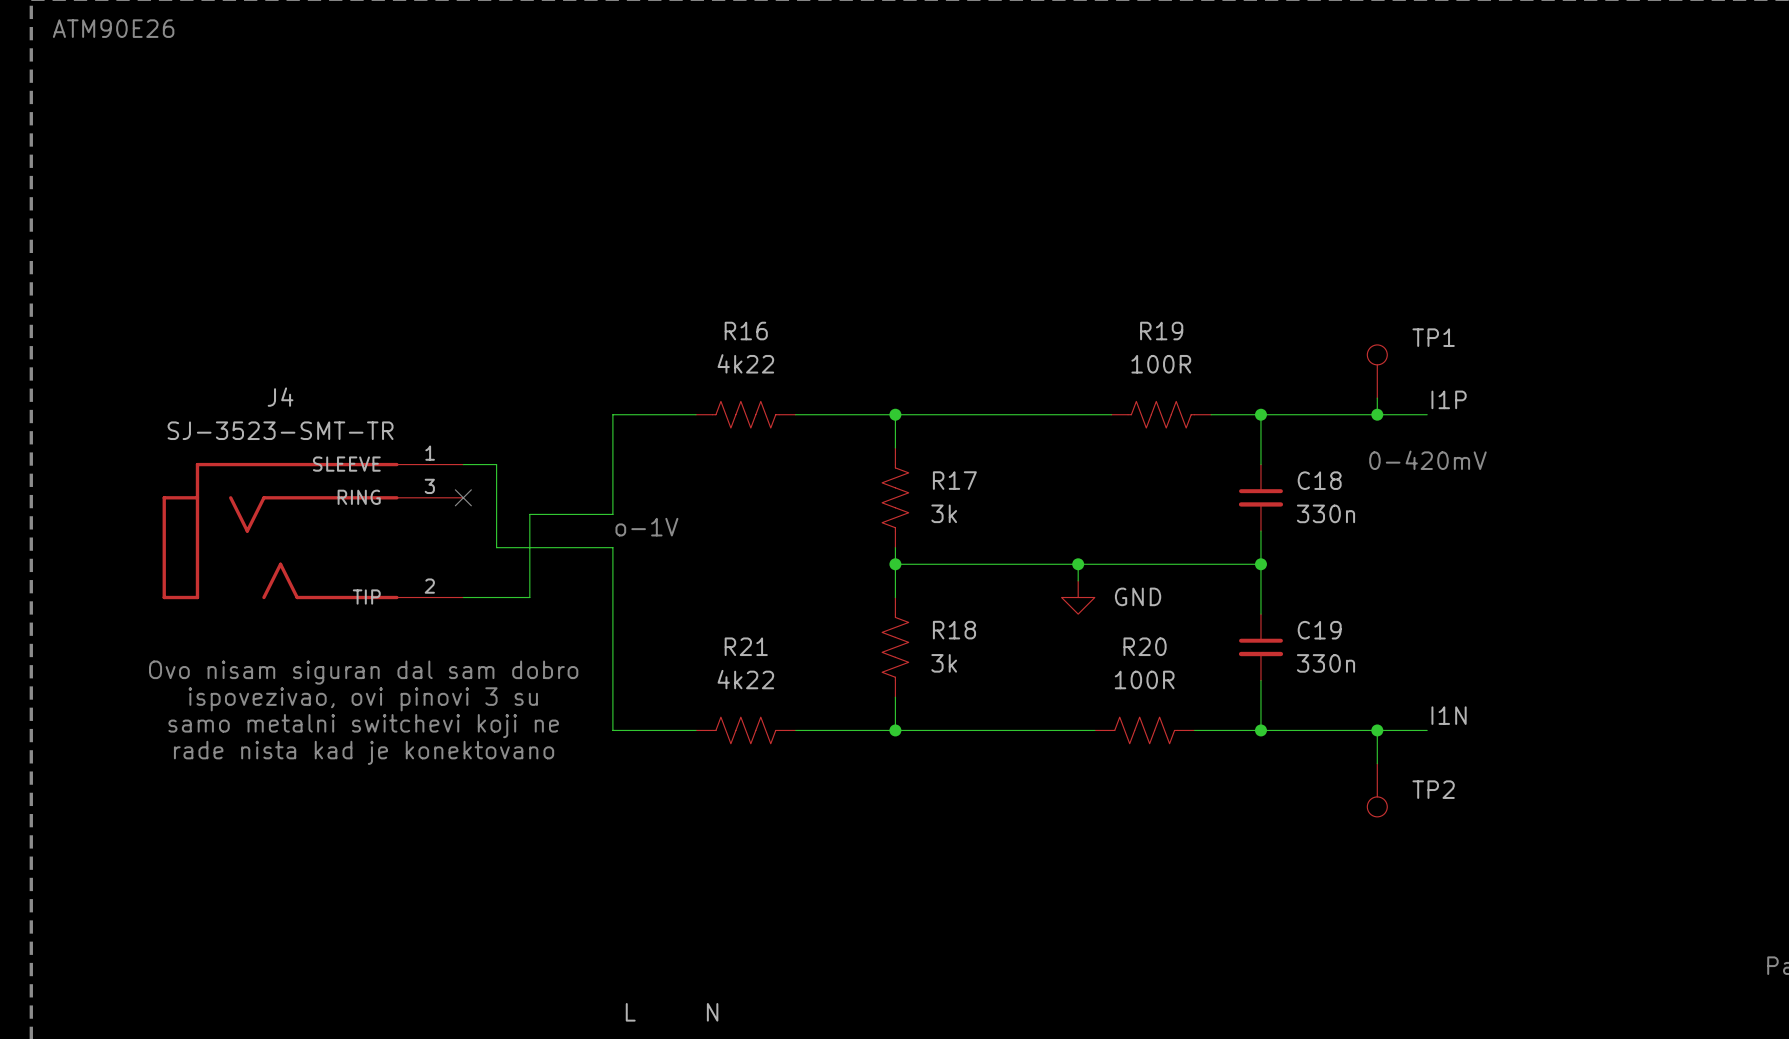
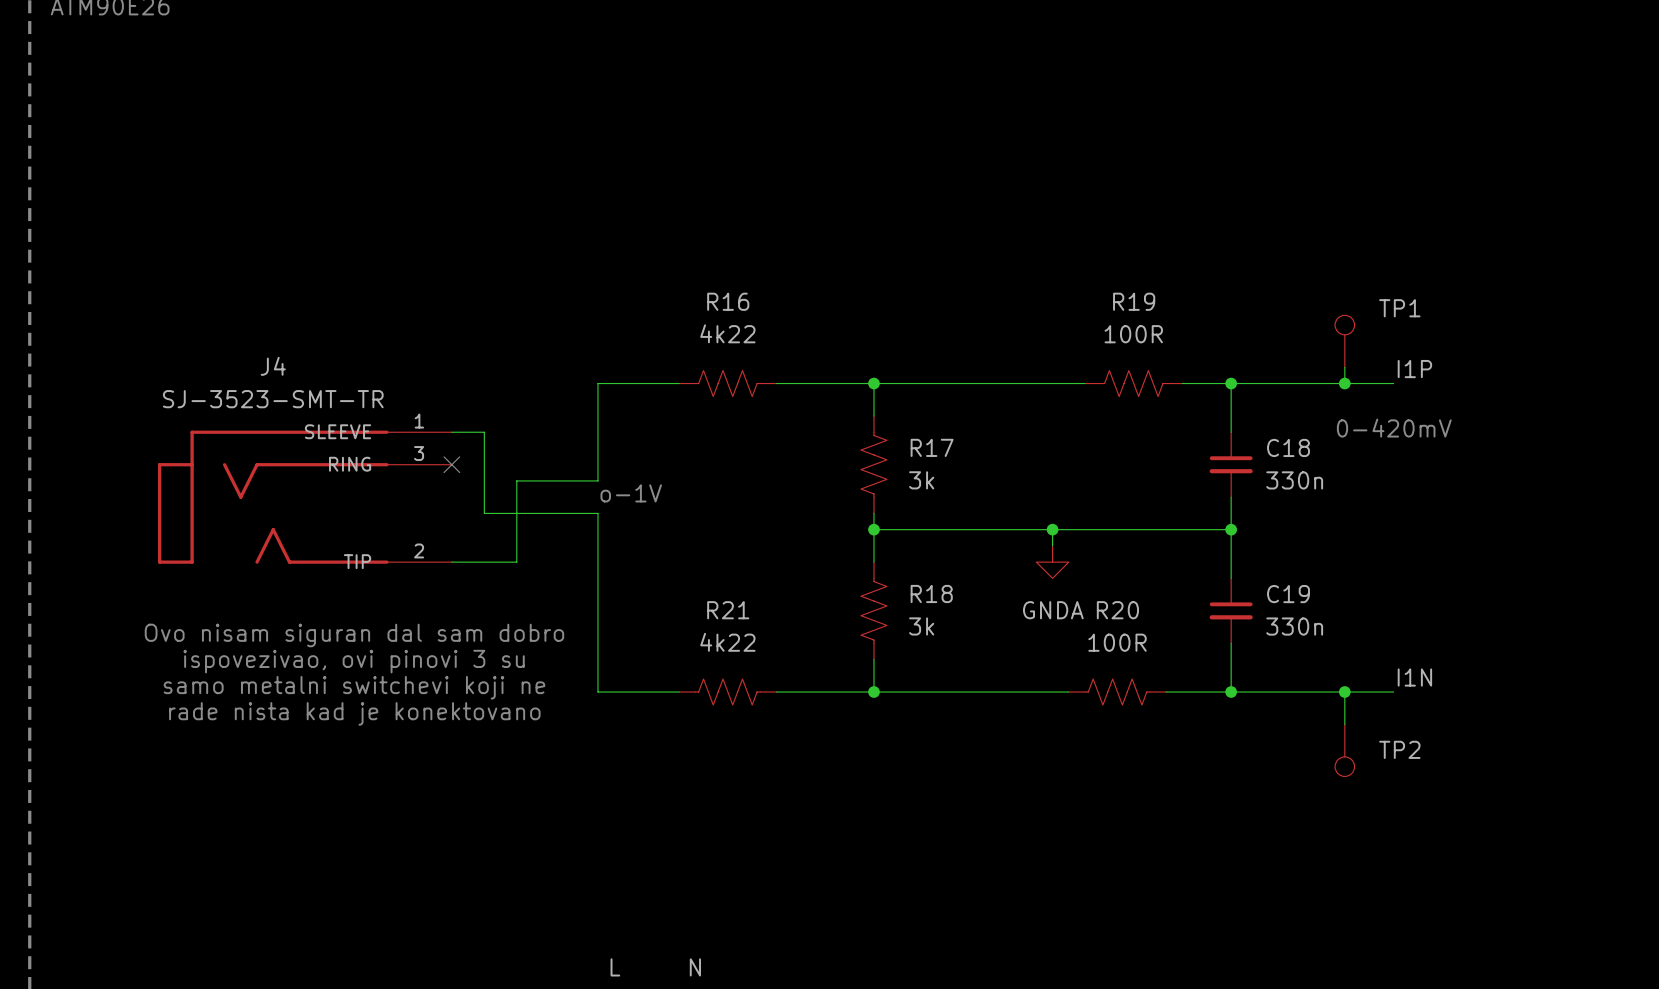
power symbol: GND (1078, 597) -> GNDA (1052, 562)

